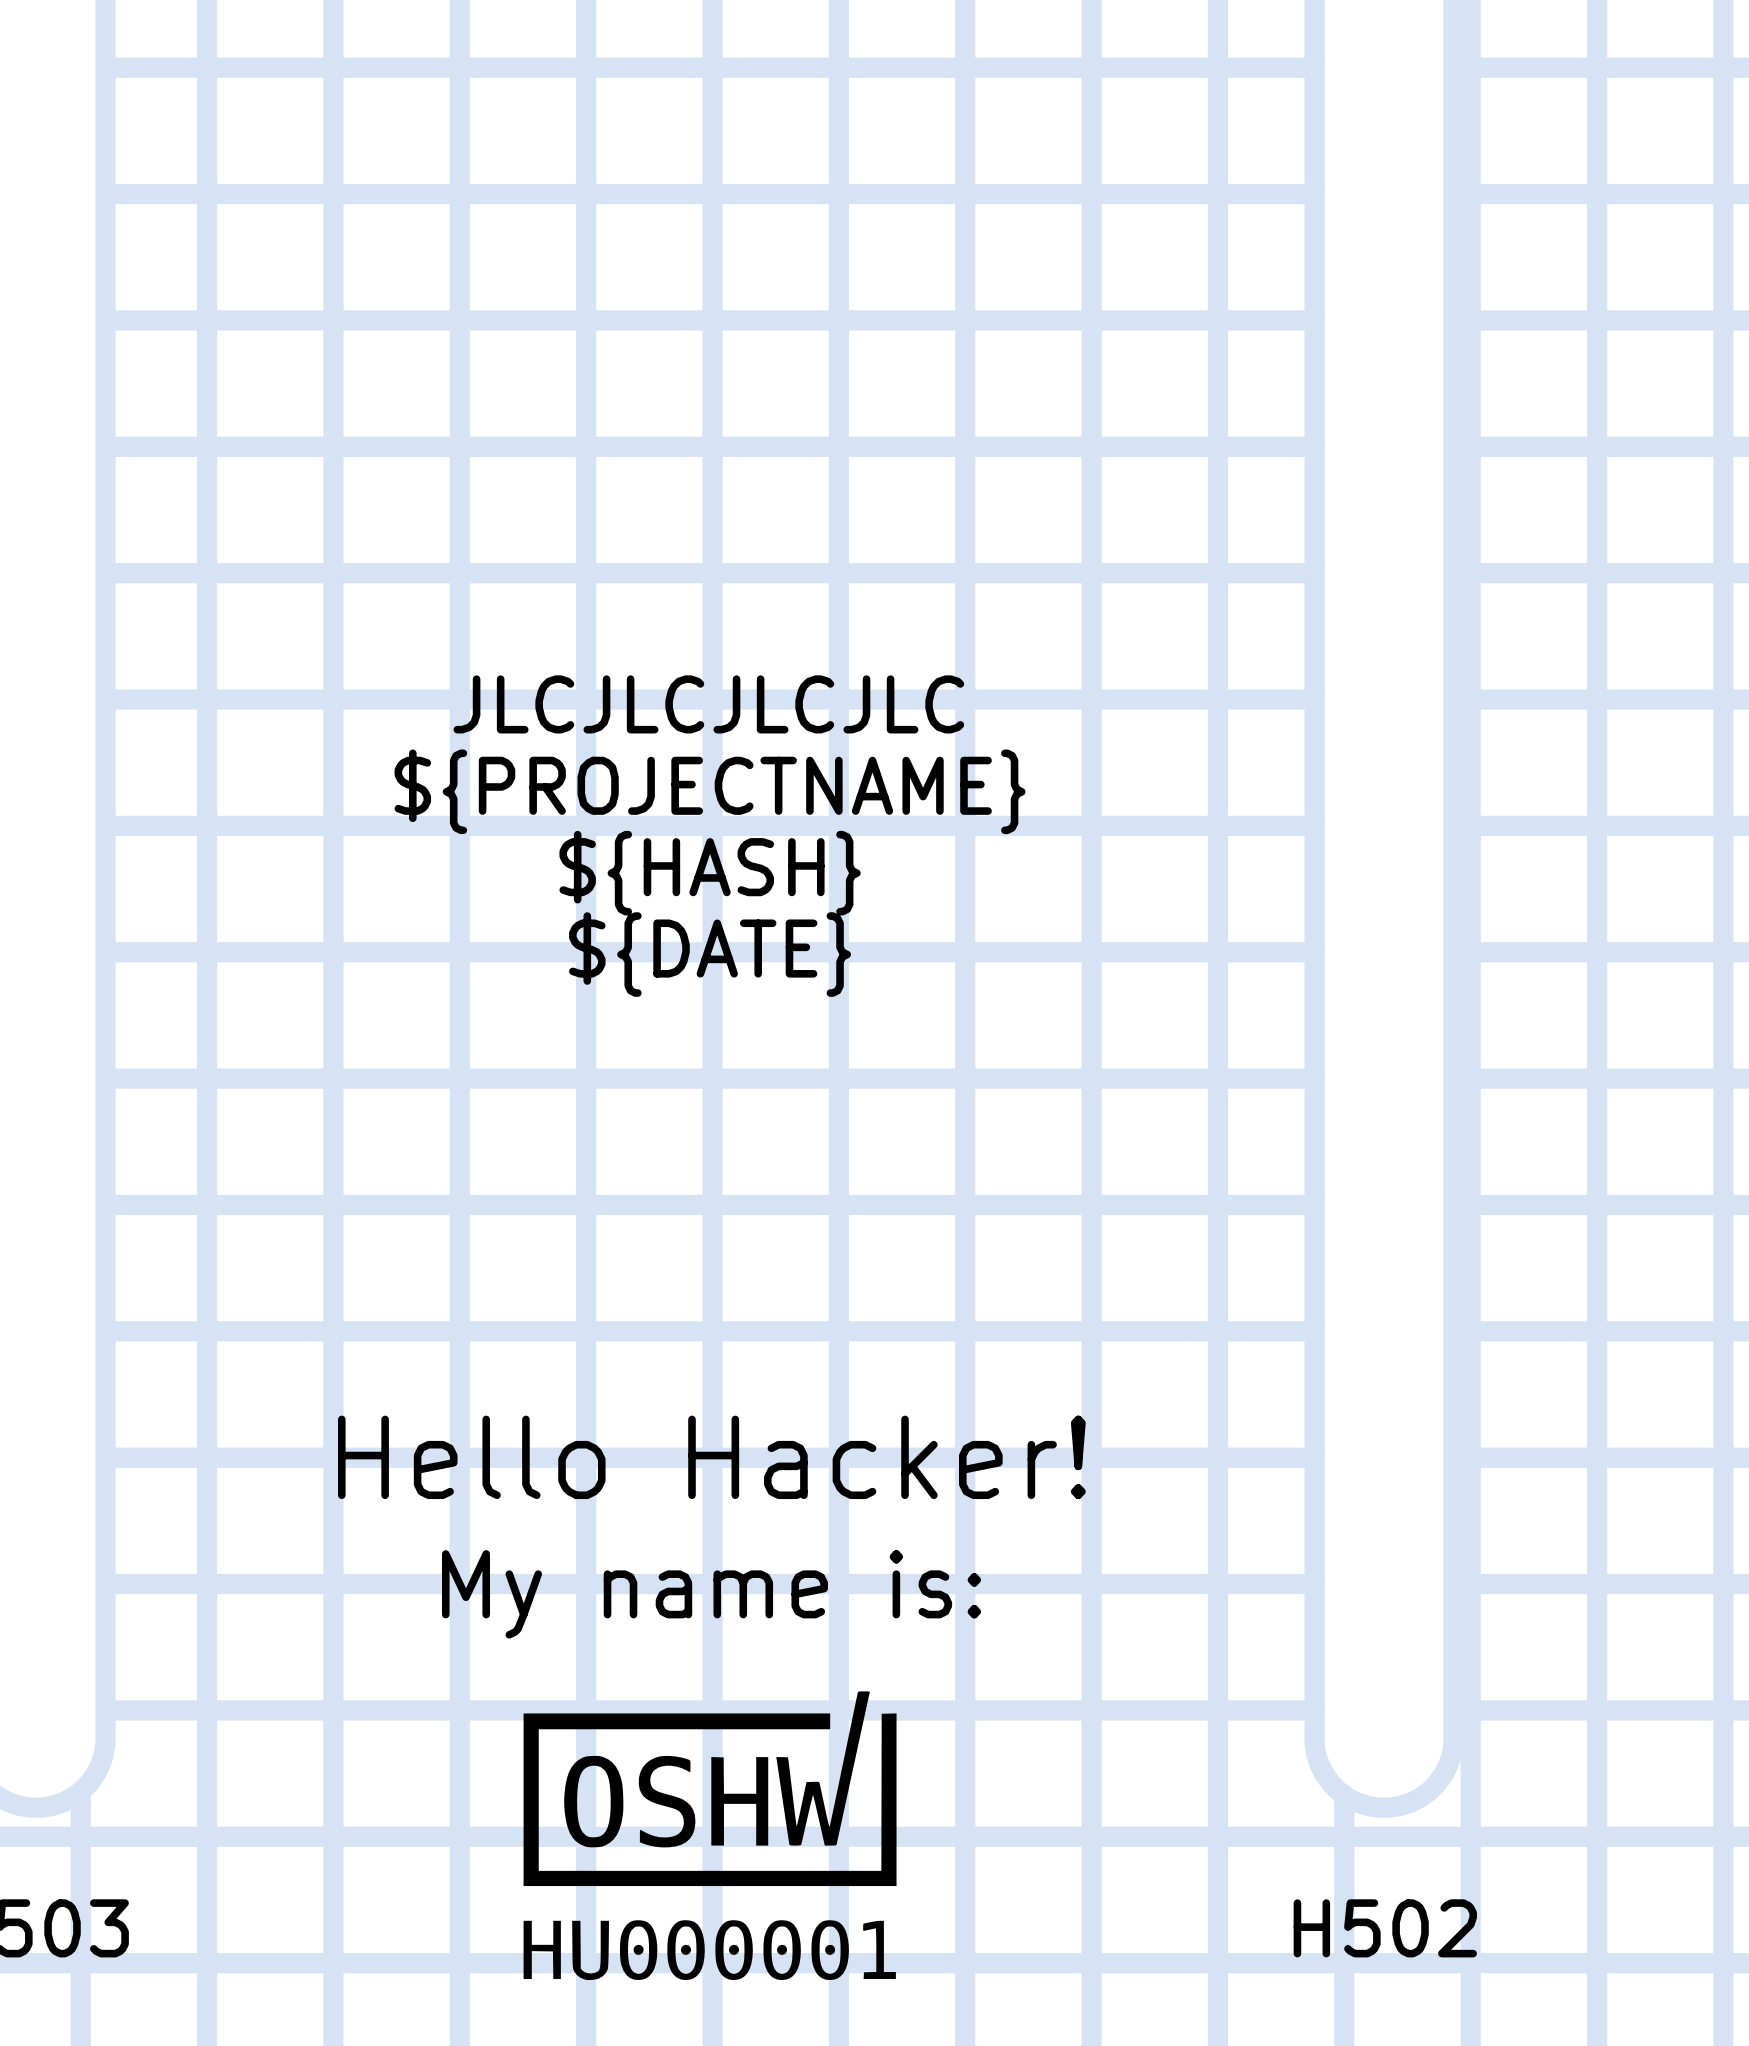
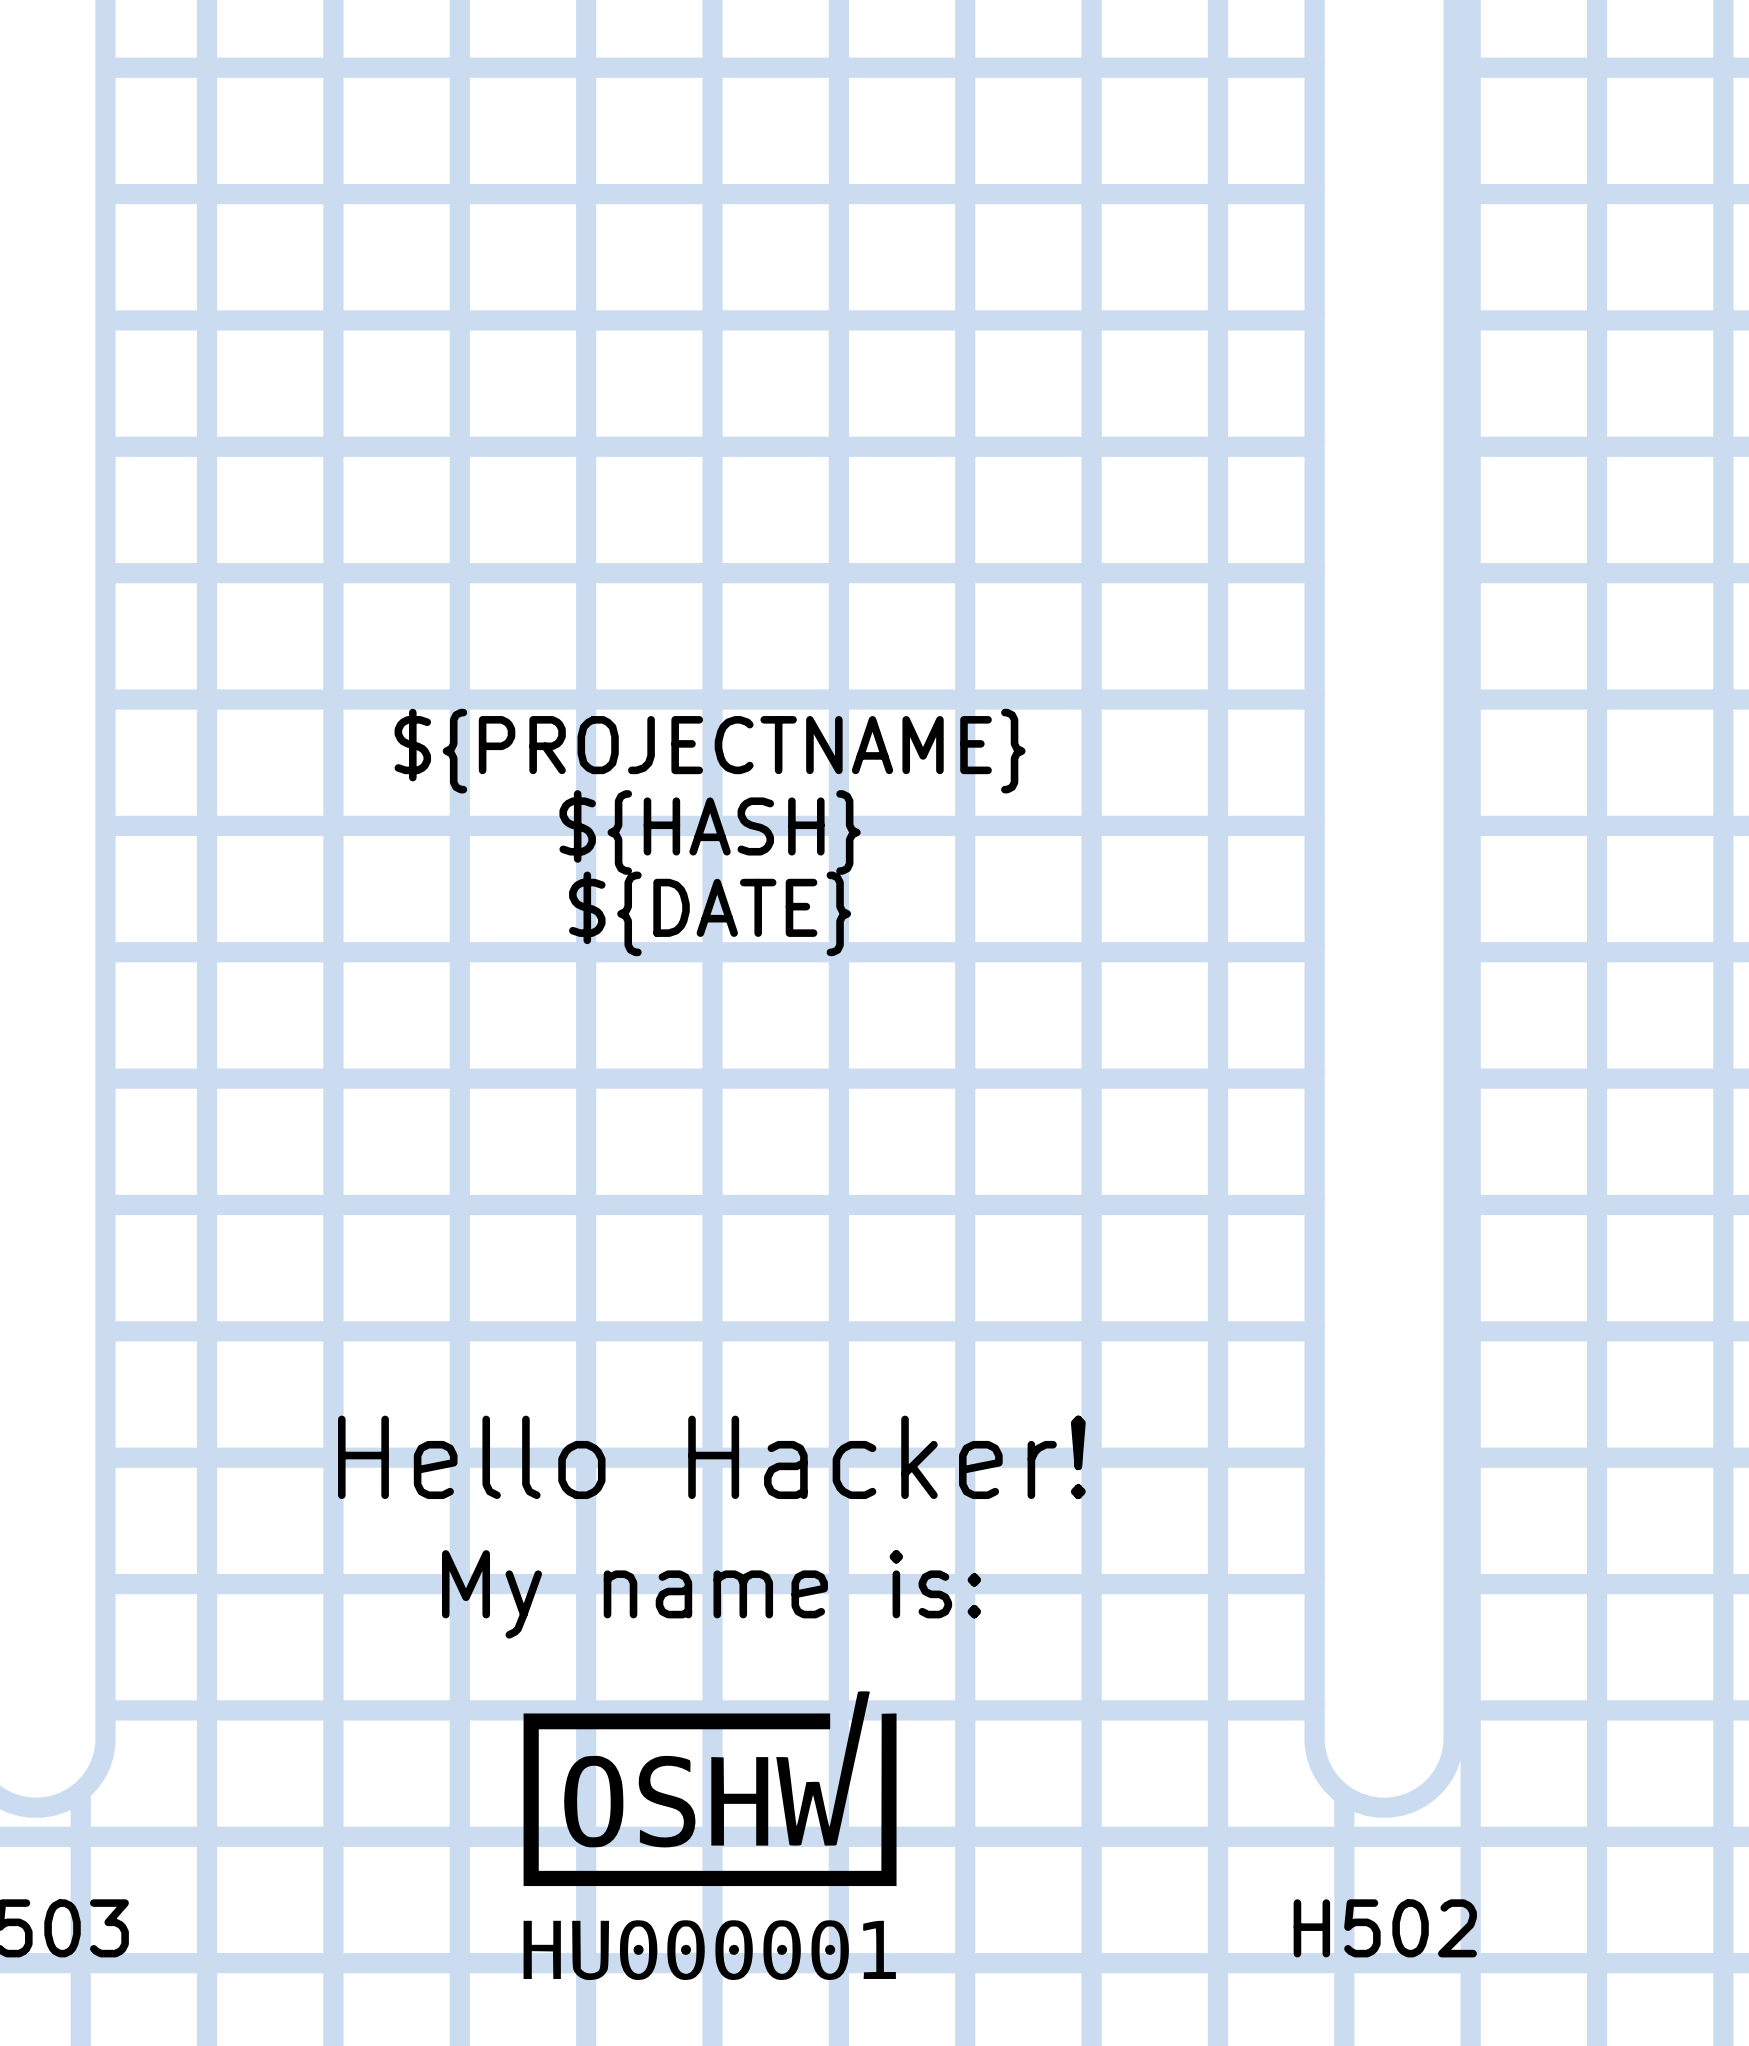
text: JLCJLCJLCJLC (708, 704) -> none
text position: ${PROJECTNAME} (710, 791) -> ${PROJECTNAME} (710, 751)
text position: ${HASH} (710, 873) -> ${HASH} (710, 832)
text position: ${DATE} (710, 954) -> ${DATE} (710, 913)

